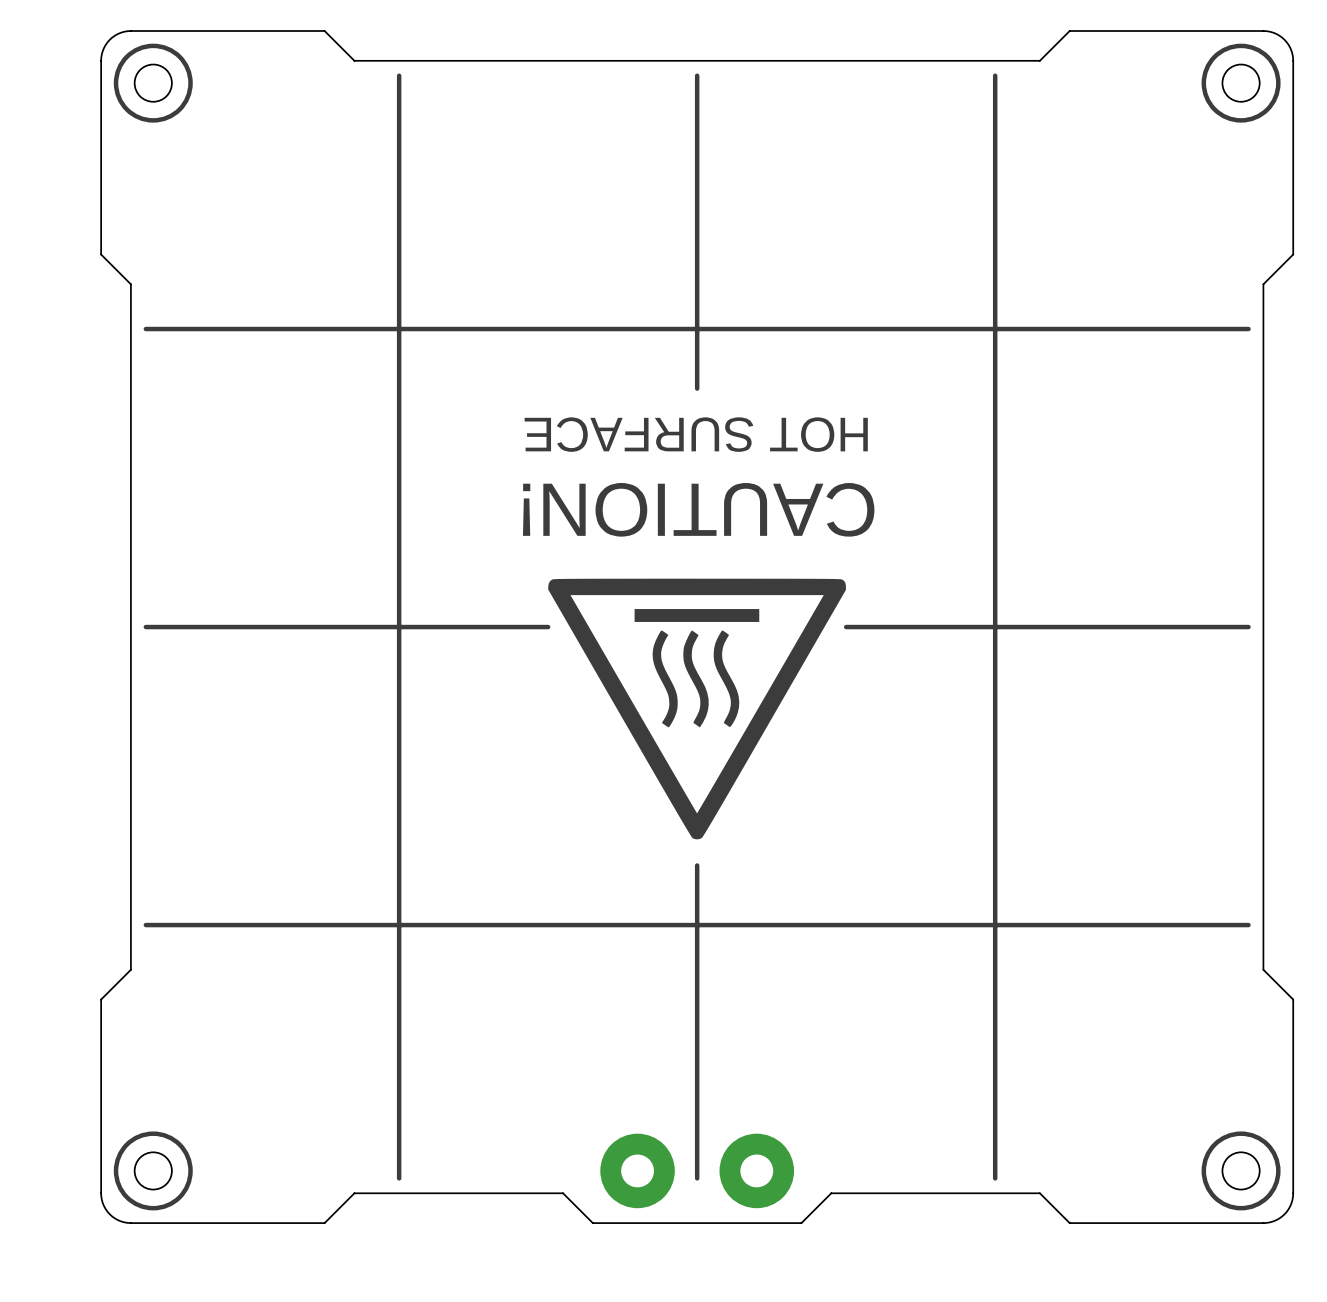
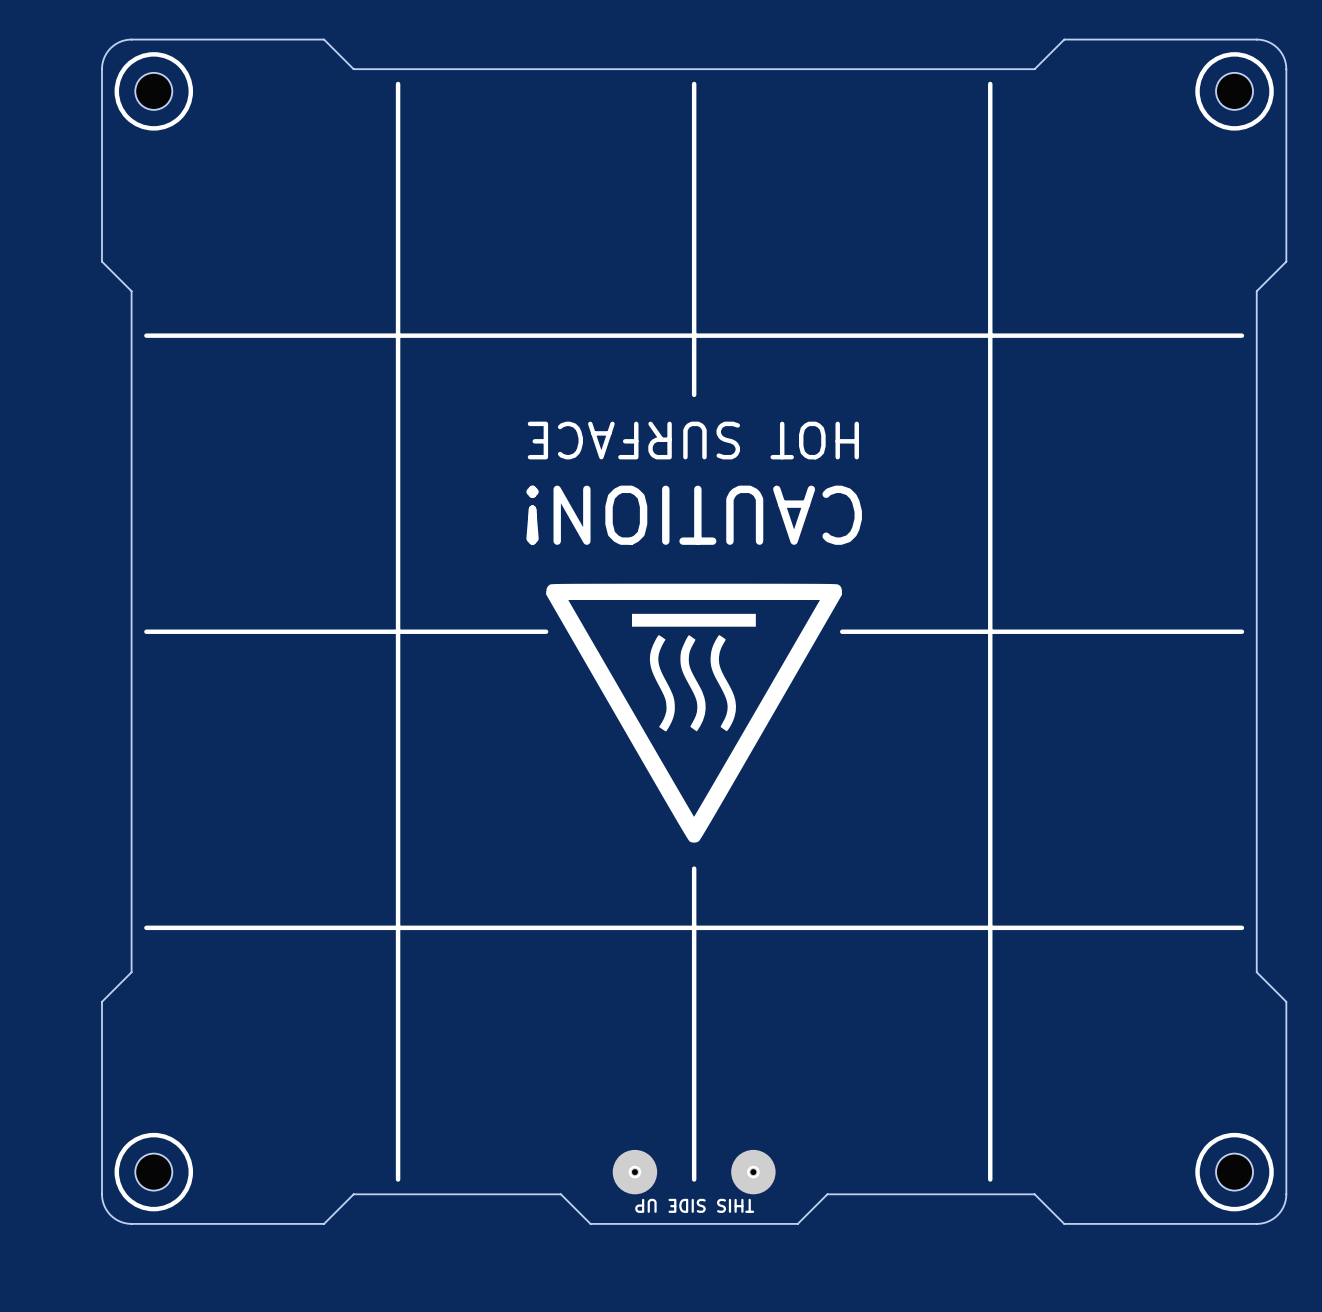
part footprint: [600, 1133, 675, 1209] -> [612, 1149, 658, 1195]
part footprint: [719, 1133, 795, 1209] -> [731, 1149, 776, 1195]
text: none -> THIS SIDE UP (694, 1205)

